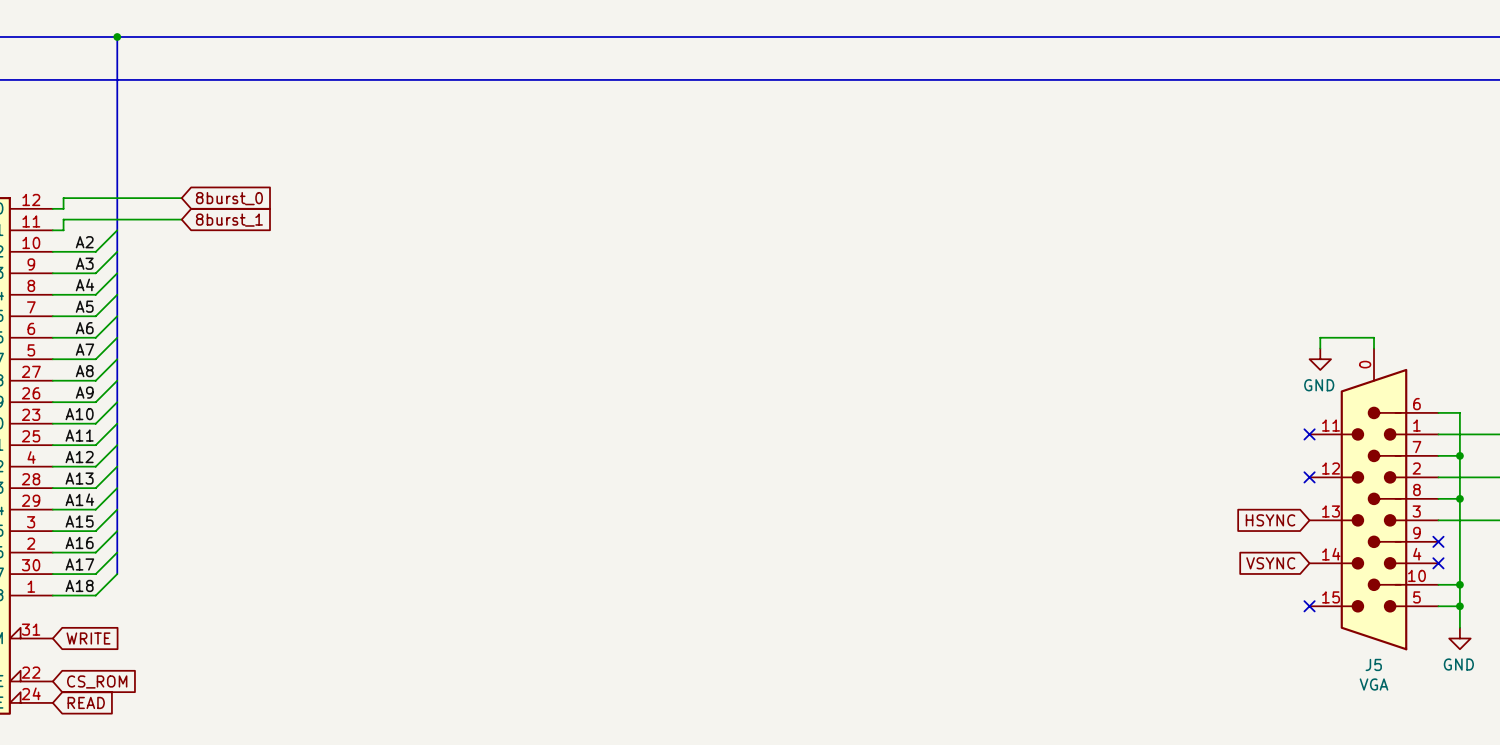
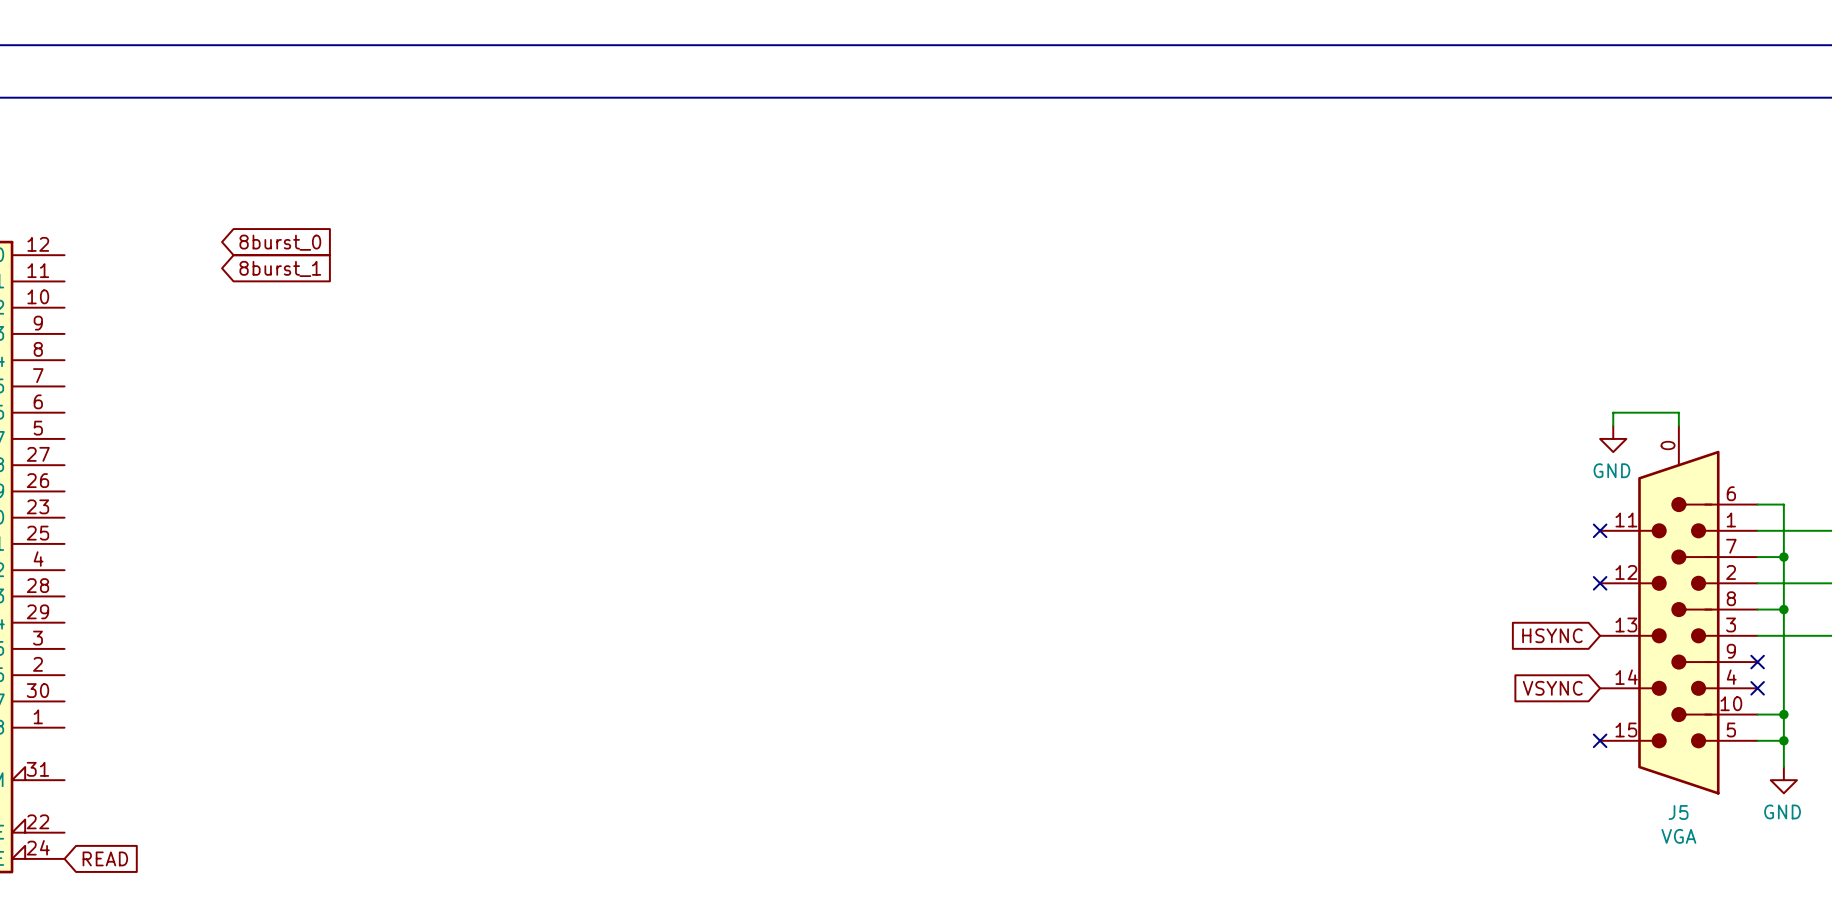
bus: (117, 36) (117, 574) -> none
junction: (117, 36) -> none
wire: (181, 198) (63, 198) (63, 208) (52, 208) -> none
wire: (181, 219) (63, 219) (63, 230) (52, 230) -> none
wire: (117, 230) (95, 251) (52, 251) -> none
label: A2 (84, 242) -> none
wire: (117, 251) (95, 273) (52, 273) -> none
label: A3 (84, 263) -> none
wire: (117, 273) (95, 294) (52, 294) -> none
label: A4 (84, 284) -> none
wire: (117, 294) (95, 316) (52, 316) -> none
label: A5 (84, 306) -> none
wire: (117, 316) (95, 337) (52, 337) -> none
label: A6 (84, 328) -> none
wire: (117, 337) (95, 359) (52, 359) -> none
label: A7 (84, 349) -> none
wire: (117, 359) (95, 380) (52, 380) -> none
label: A8 (84, 371) -> none
wire: (117, 380) (95, 402) (52, 402) -> none
label: A9 (84, 392) -> none
wire: (117, 402) (95, 423) (52, 423) -> none
label: A10 (79, 414) -> none
wire: (117, 423) (95, 445) (52, 445) -> none
label: A11 (79, 435) -> none
wire: (117, 445) (95, 466) (52, 466) -> none
label: A12 (79, 457) -> none
wire: (117, 466) (95, 488) (52, 488) -> none
label: A13 (79, 478) -> none
wire: (117, 488) (95, 509) (52, 509) -> none
label: A14 (79, 499) -> none
wire: (117, 509) (95, 531) (52, 531) -> none
label: A15 (79, 521) -> none
wire: (117, 531) (95, 552) (52, 552) -> none
label: A16 (79, 542) -> none
wire: (117, 552) (95, 574) (52, 574) -> none
label: A17 (79, 564) -> none
wire: (117, 574) (95, 595) (52, 595) -> none
label: A18 (79, 585) -> none
global label: WRITE (88, 638) -> none
global label: CS_ROM (97, 681) -> none

